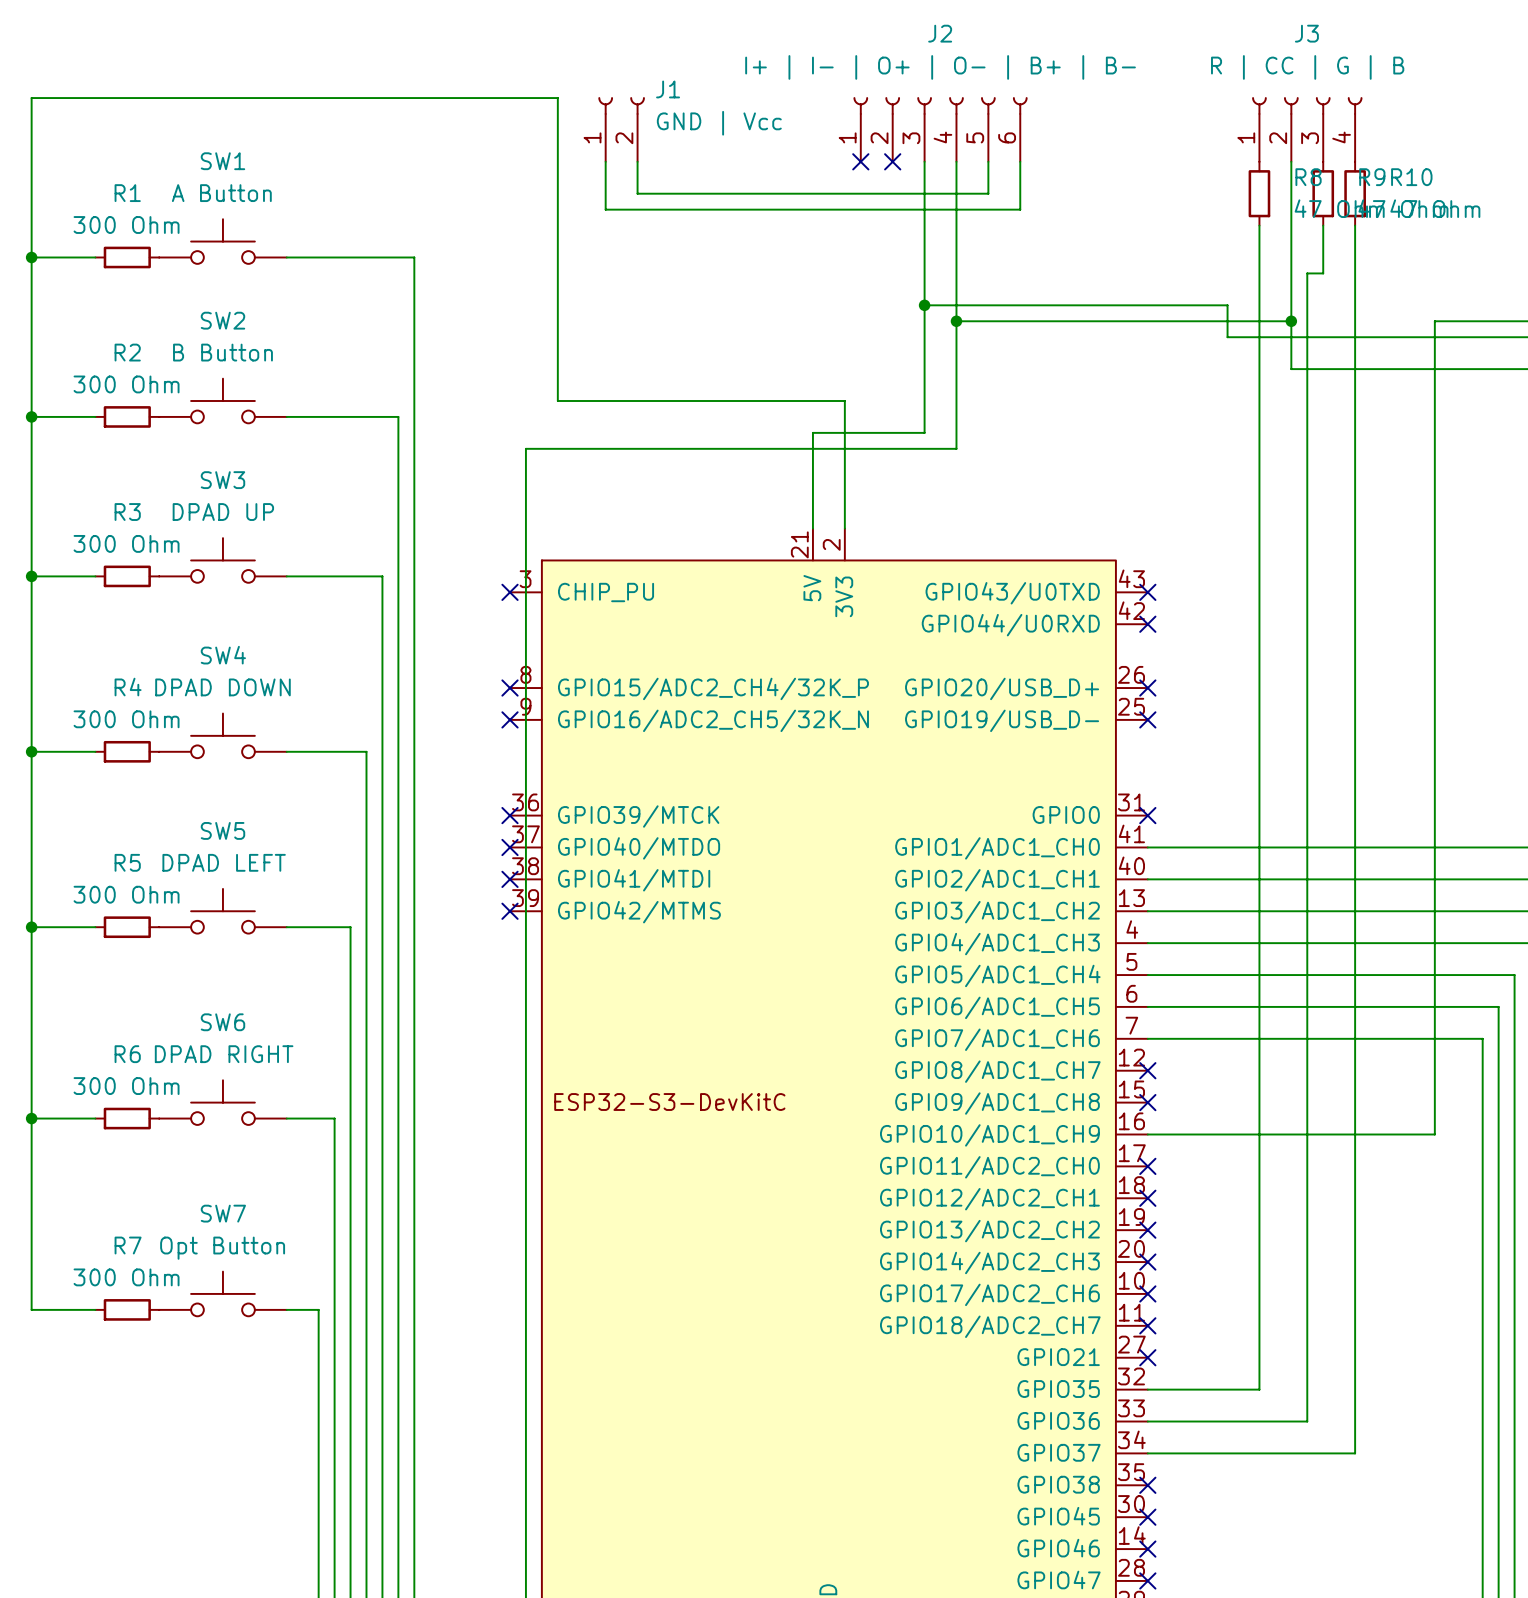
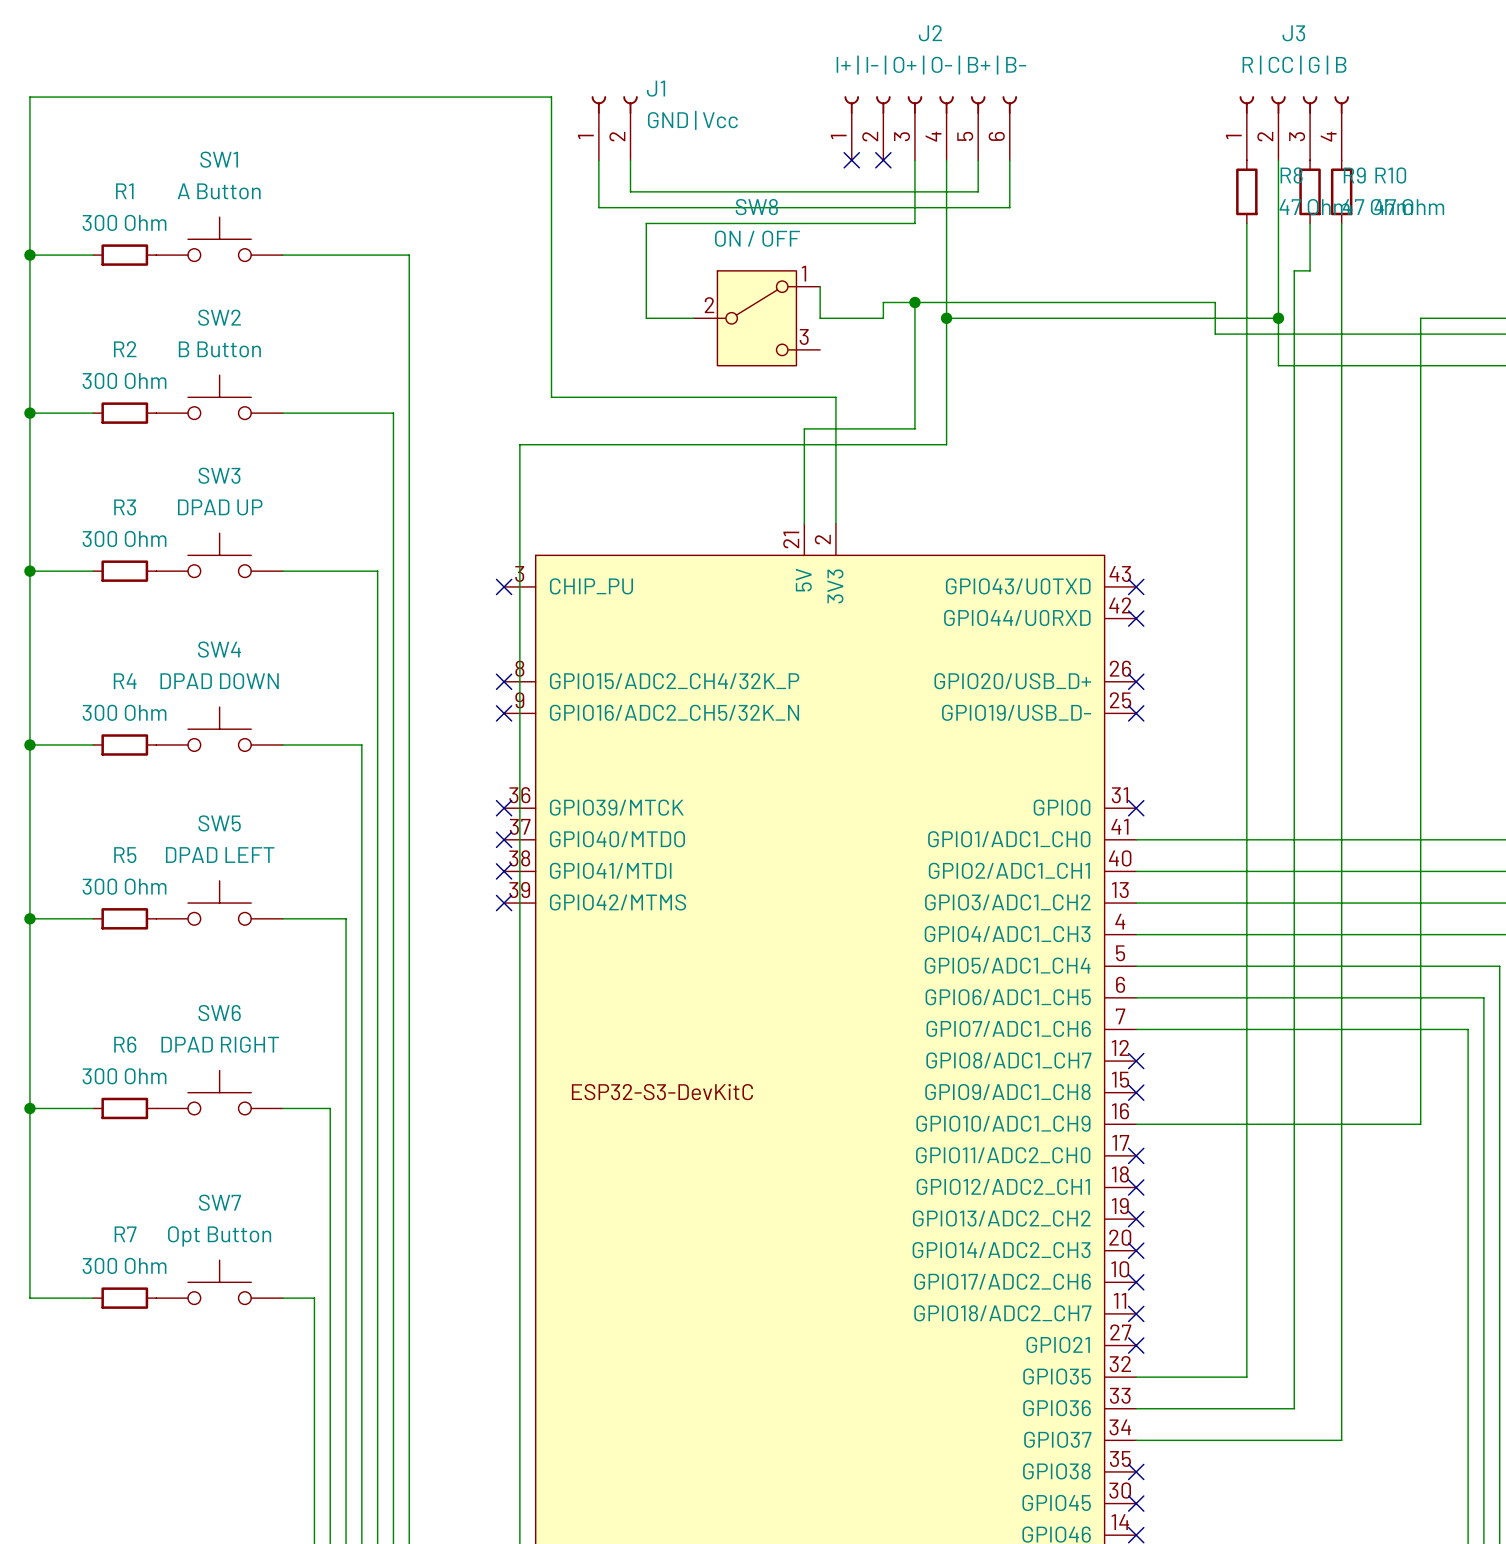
wire: (924, 225) (924, 305) -> (820, 286) (820, 318) (883, 318) (883, 302) (914, 302)
wire: none -> (914, 223) (646, 223) (646, 318) (693, 318)
SW8: none -> ON / OFF (756, 318)

